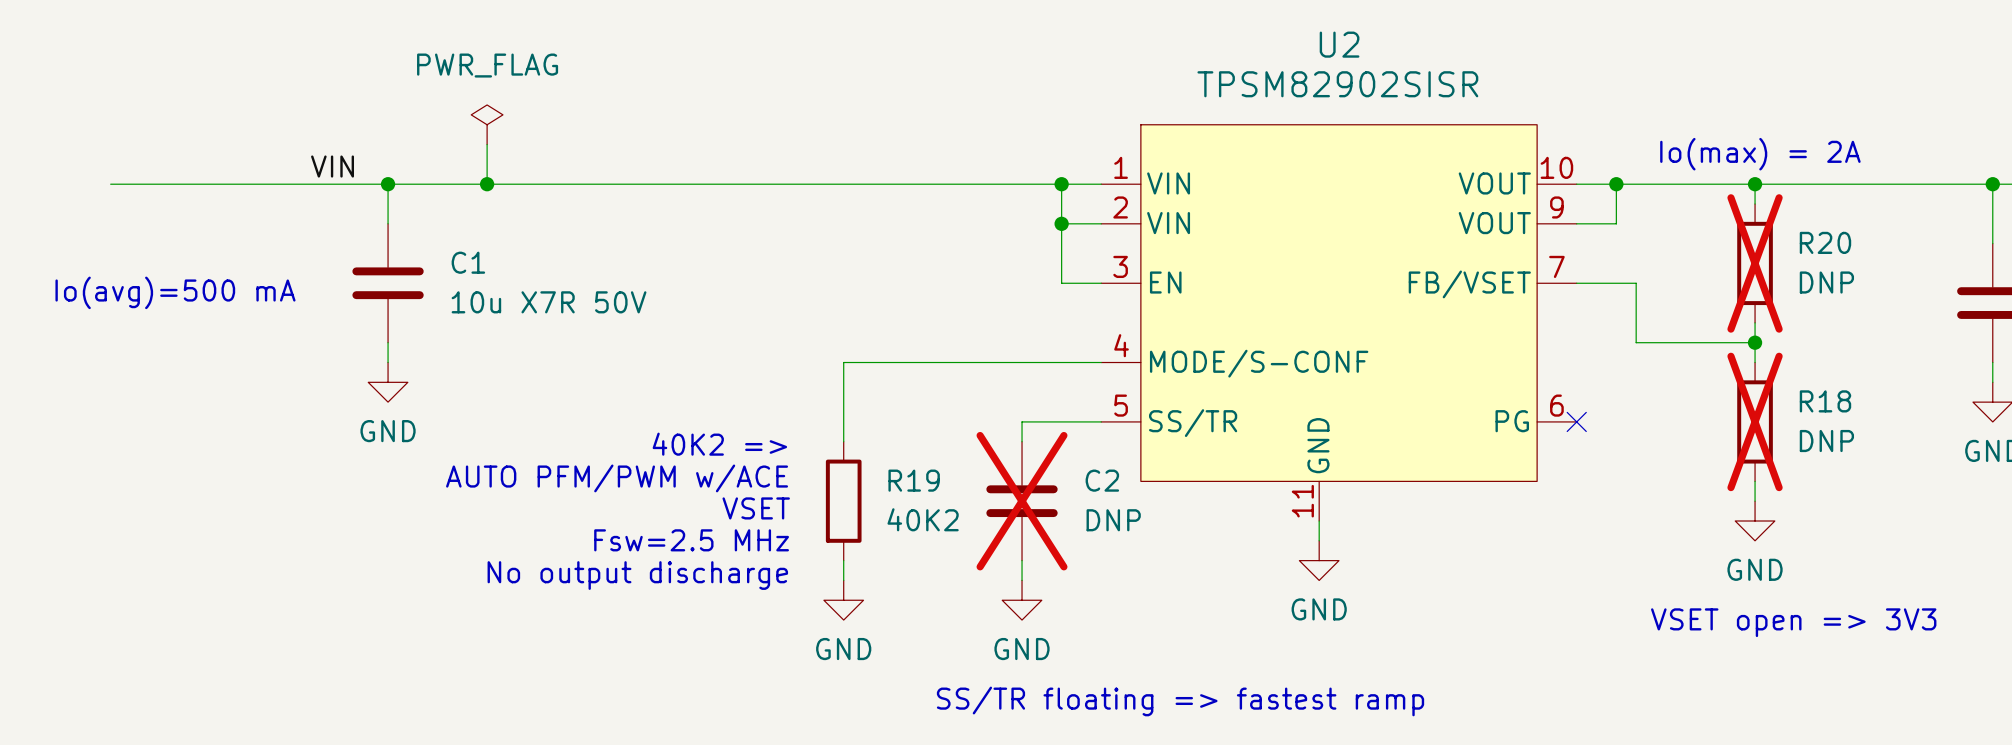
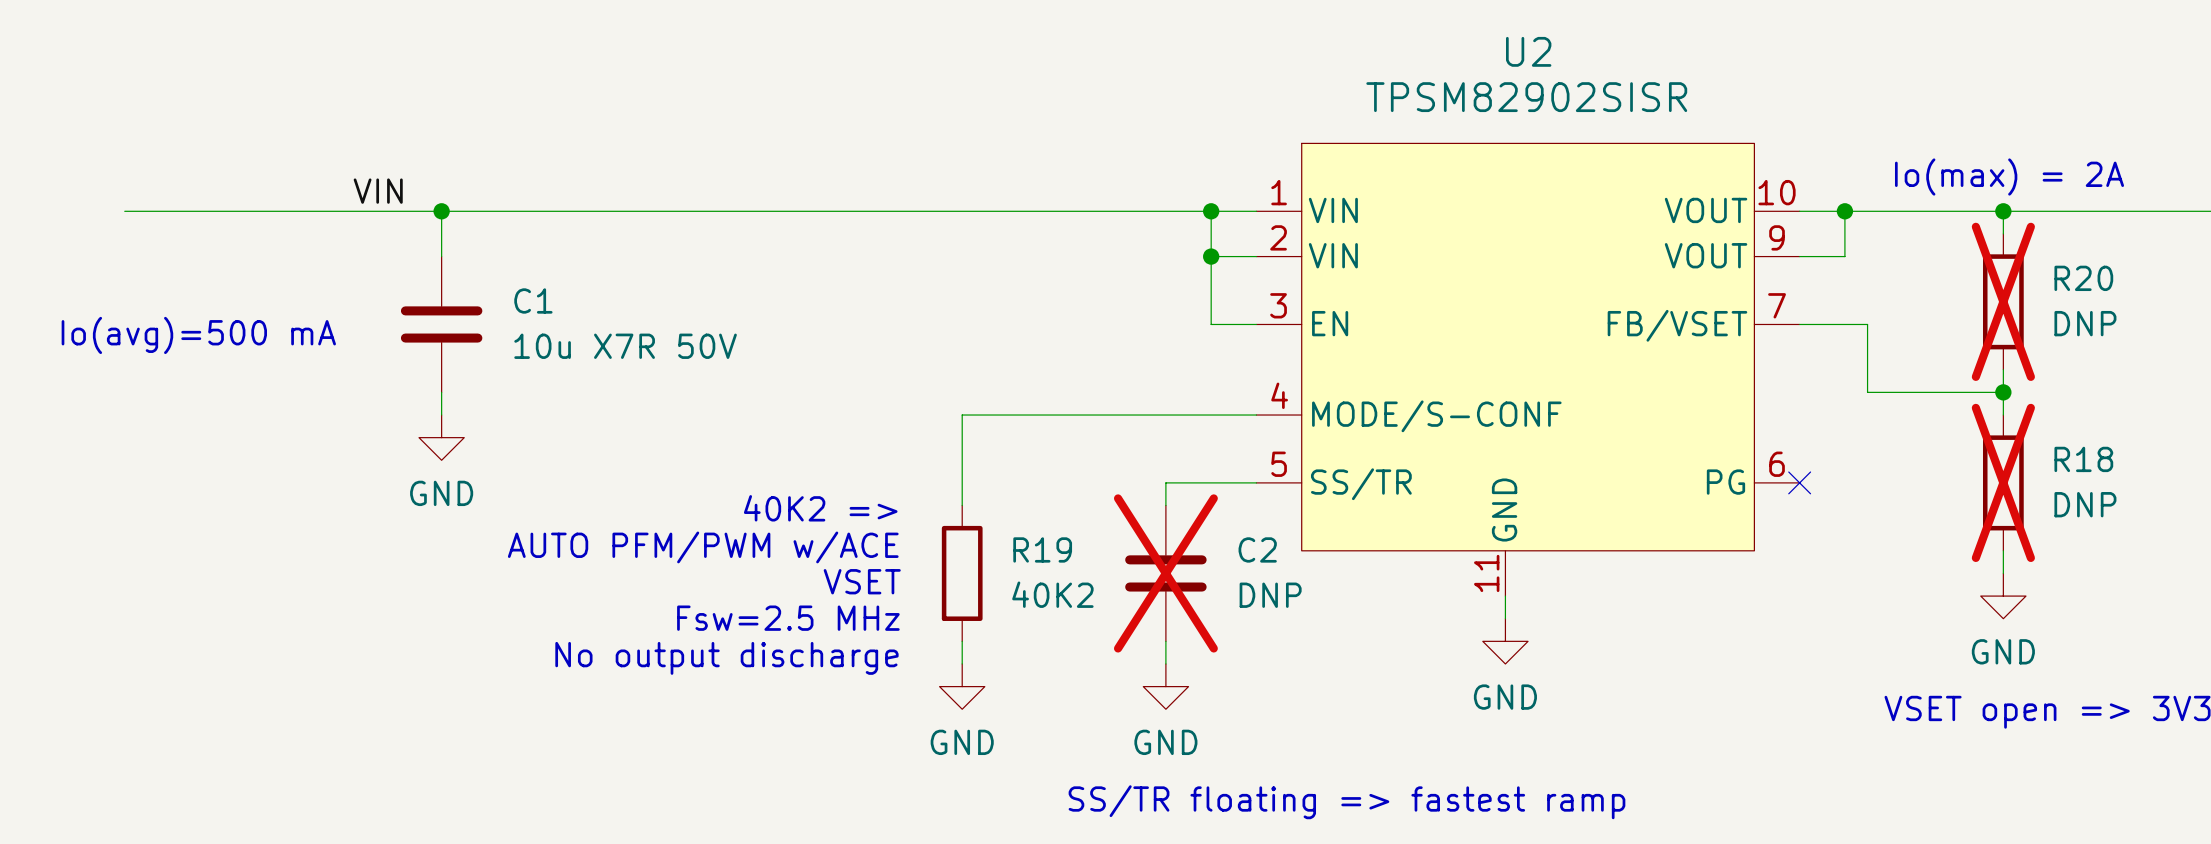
power symbol: PWR_FLAG (487, 124) -> none
wire: (487, 144) (487, 184) -> none
junction: (487, 184) -> none

